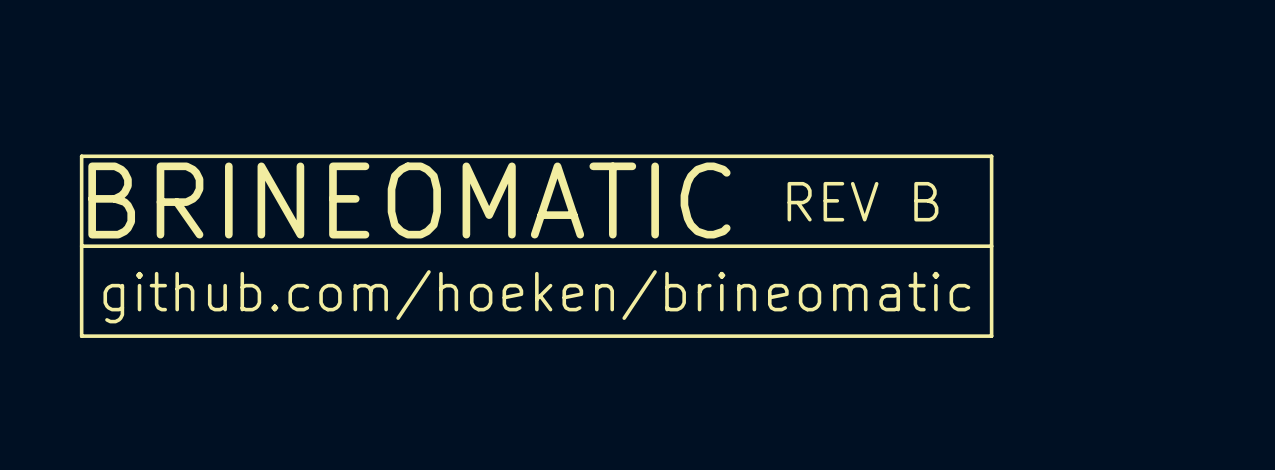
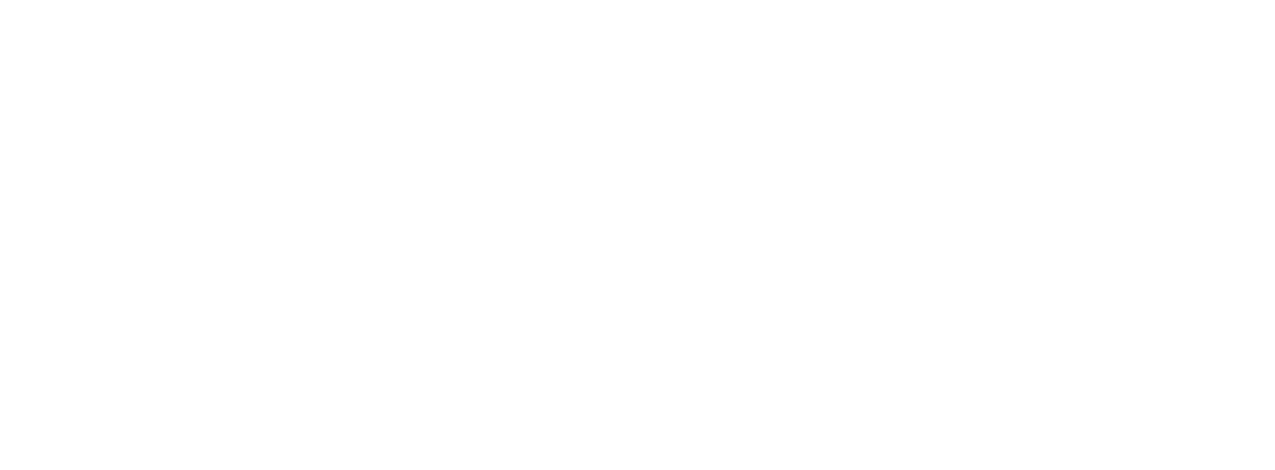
line: (81, 156) (991, 156) (991, 336) (81, 336) (81, 156) -> none
text: BRINEOMATIC (409, 200) -> none
text: REV B (862, 201) -> none
line: (81, 246) (991, 246) -> none
text: github.com/hoeken/brineomatic (536, 296) -> none

